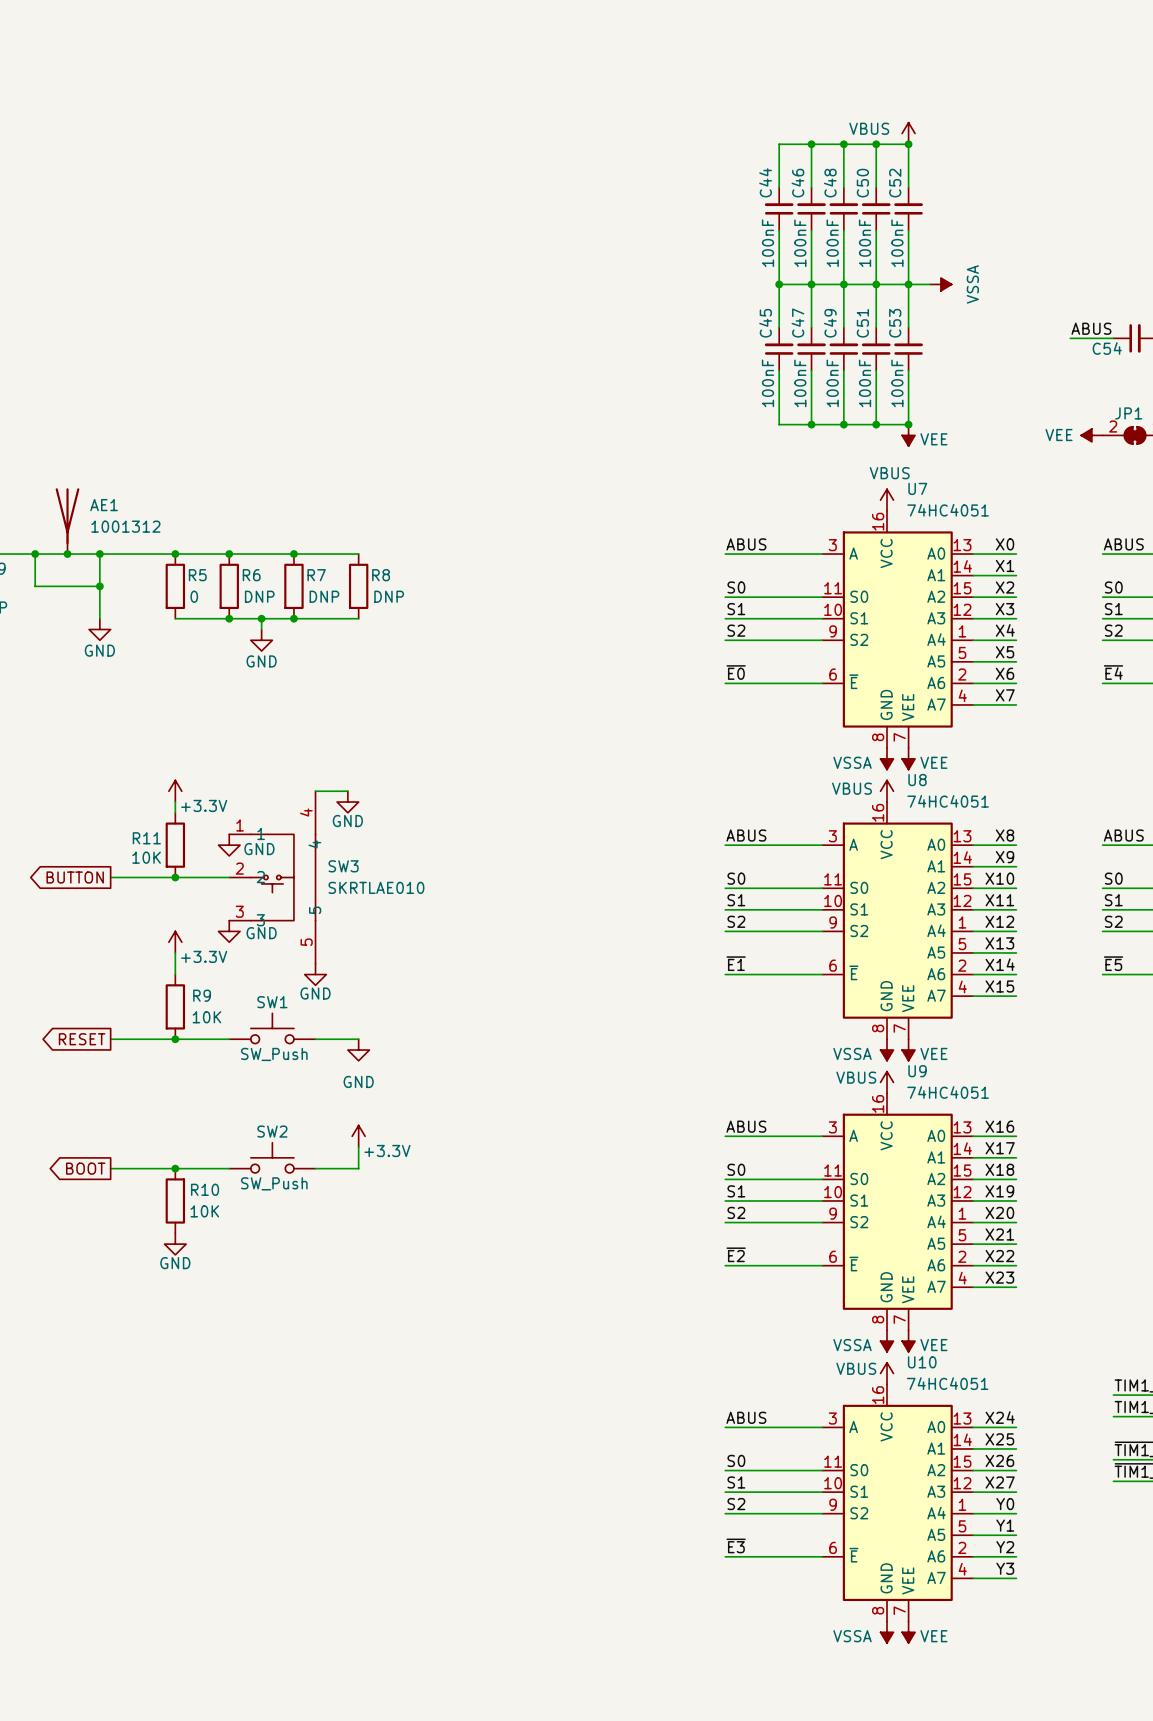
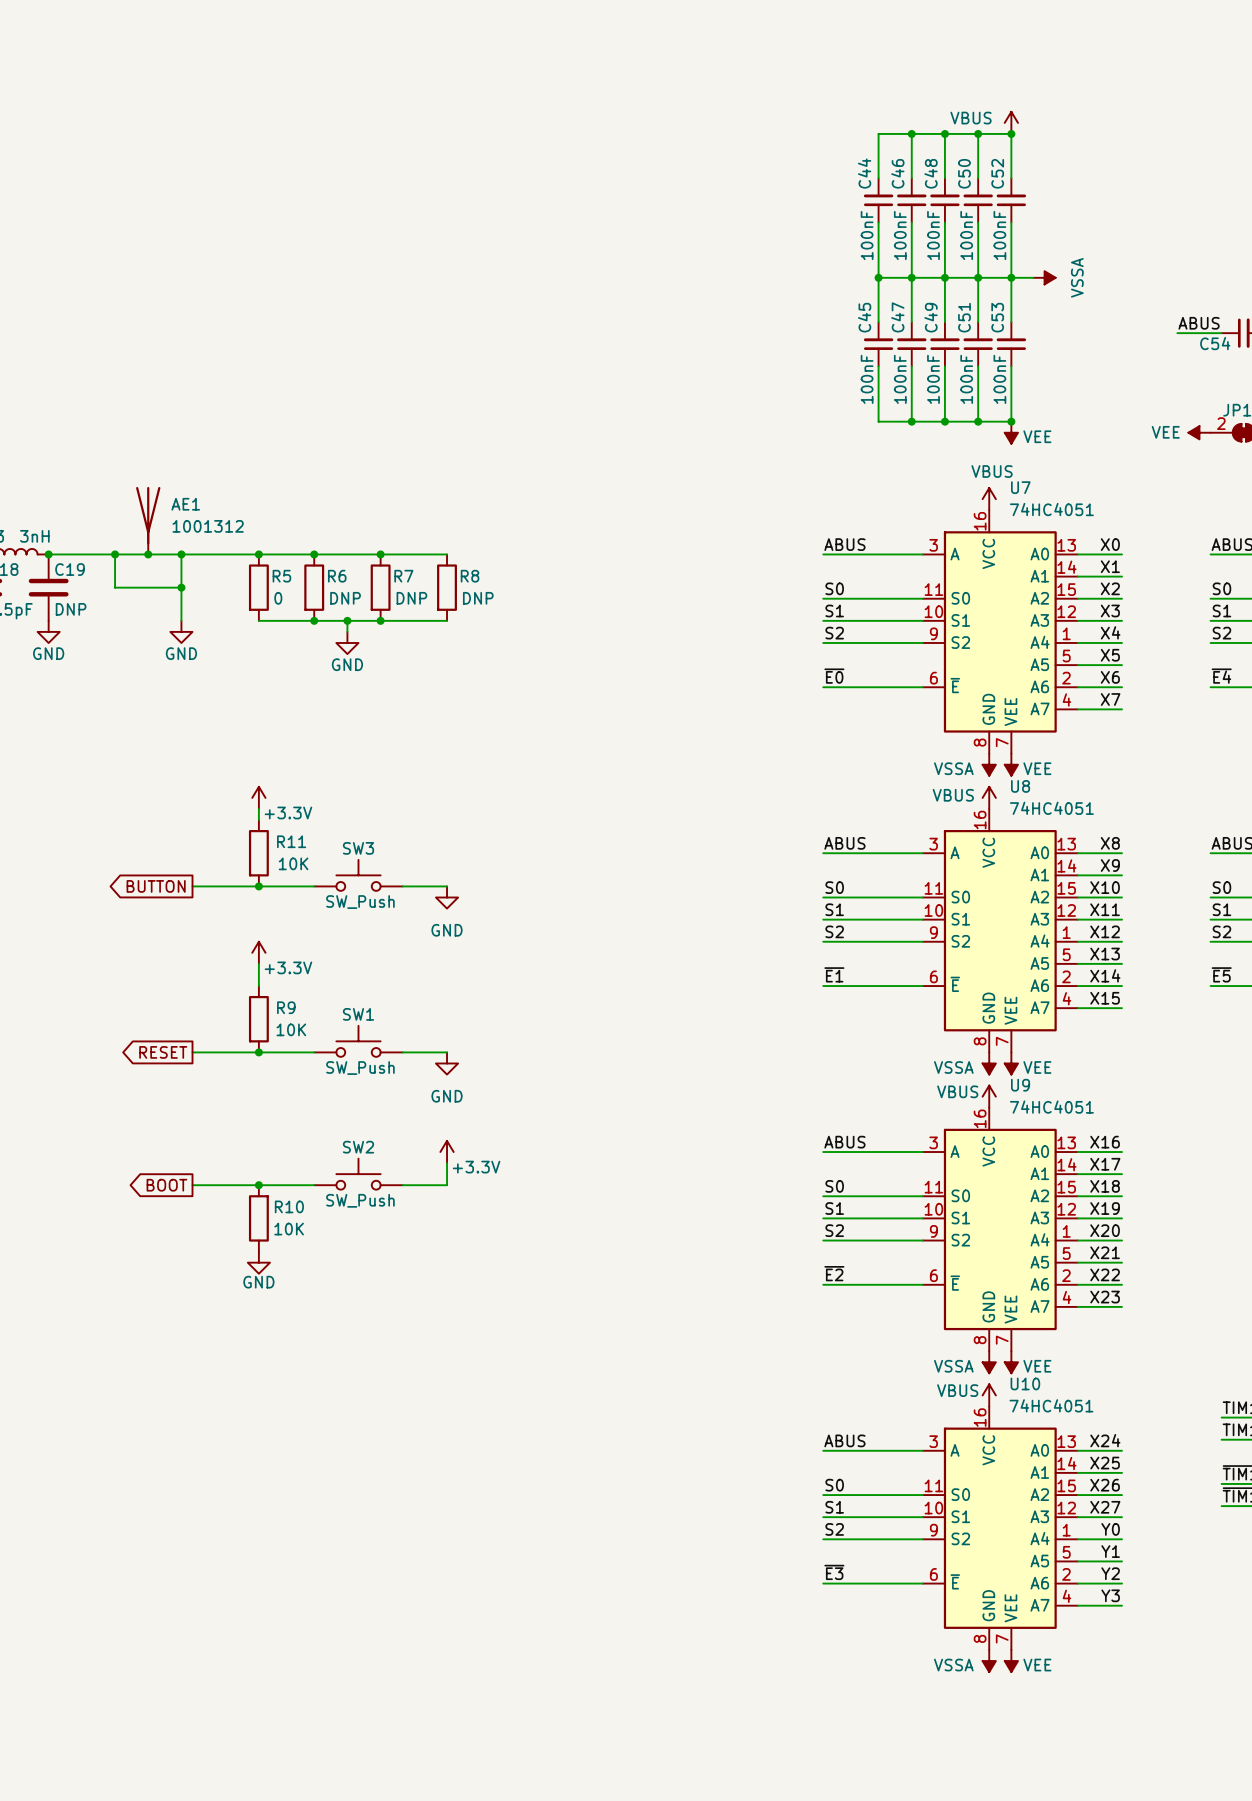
SW3 symbol: [229, 791, 316, 964] -> [314, 859, 403, 891]
wire: (315, 791) (347, 791) -> none
power symbol: GND (347, 802) -> none
R11 name position: R11 (146, 838) -> R11 (291, 841)
power symbol: GND (229, 845) -> none
R11 value position: 10K (146, 857) -> 10K (293, 863)
SW3 name position: SW3 (343, 866) -> SW3 (358, 848)
wire: none -> (402, 886) (447, 886)
SW3 value: SKRTLAE010 (376, 887) -> SW_Push (360, 902)
power symbol: none -> GND (447, 897)
power symbol: GND (229, 931) -> none
power symbol: GND (315, 974) -> none

